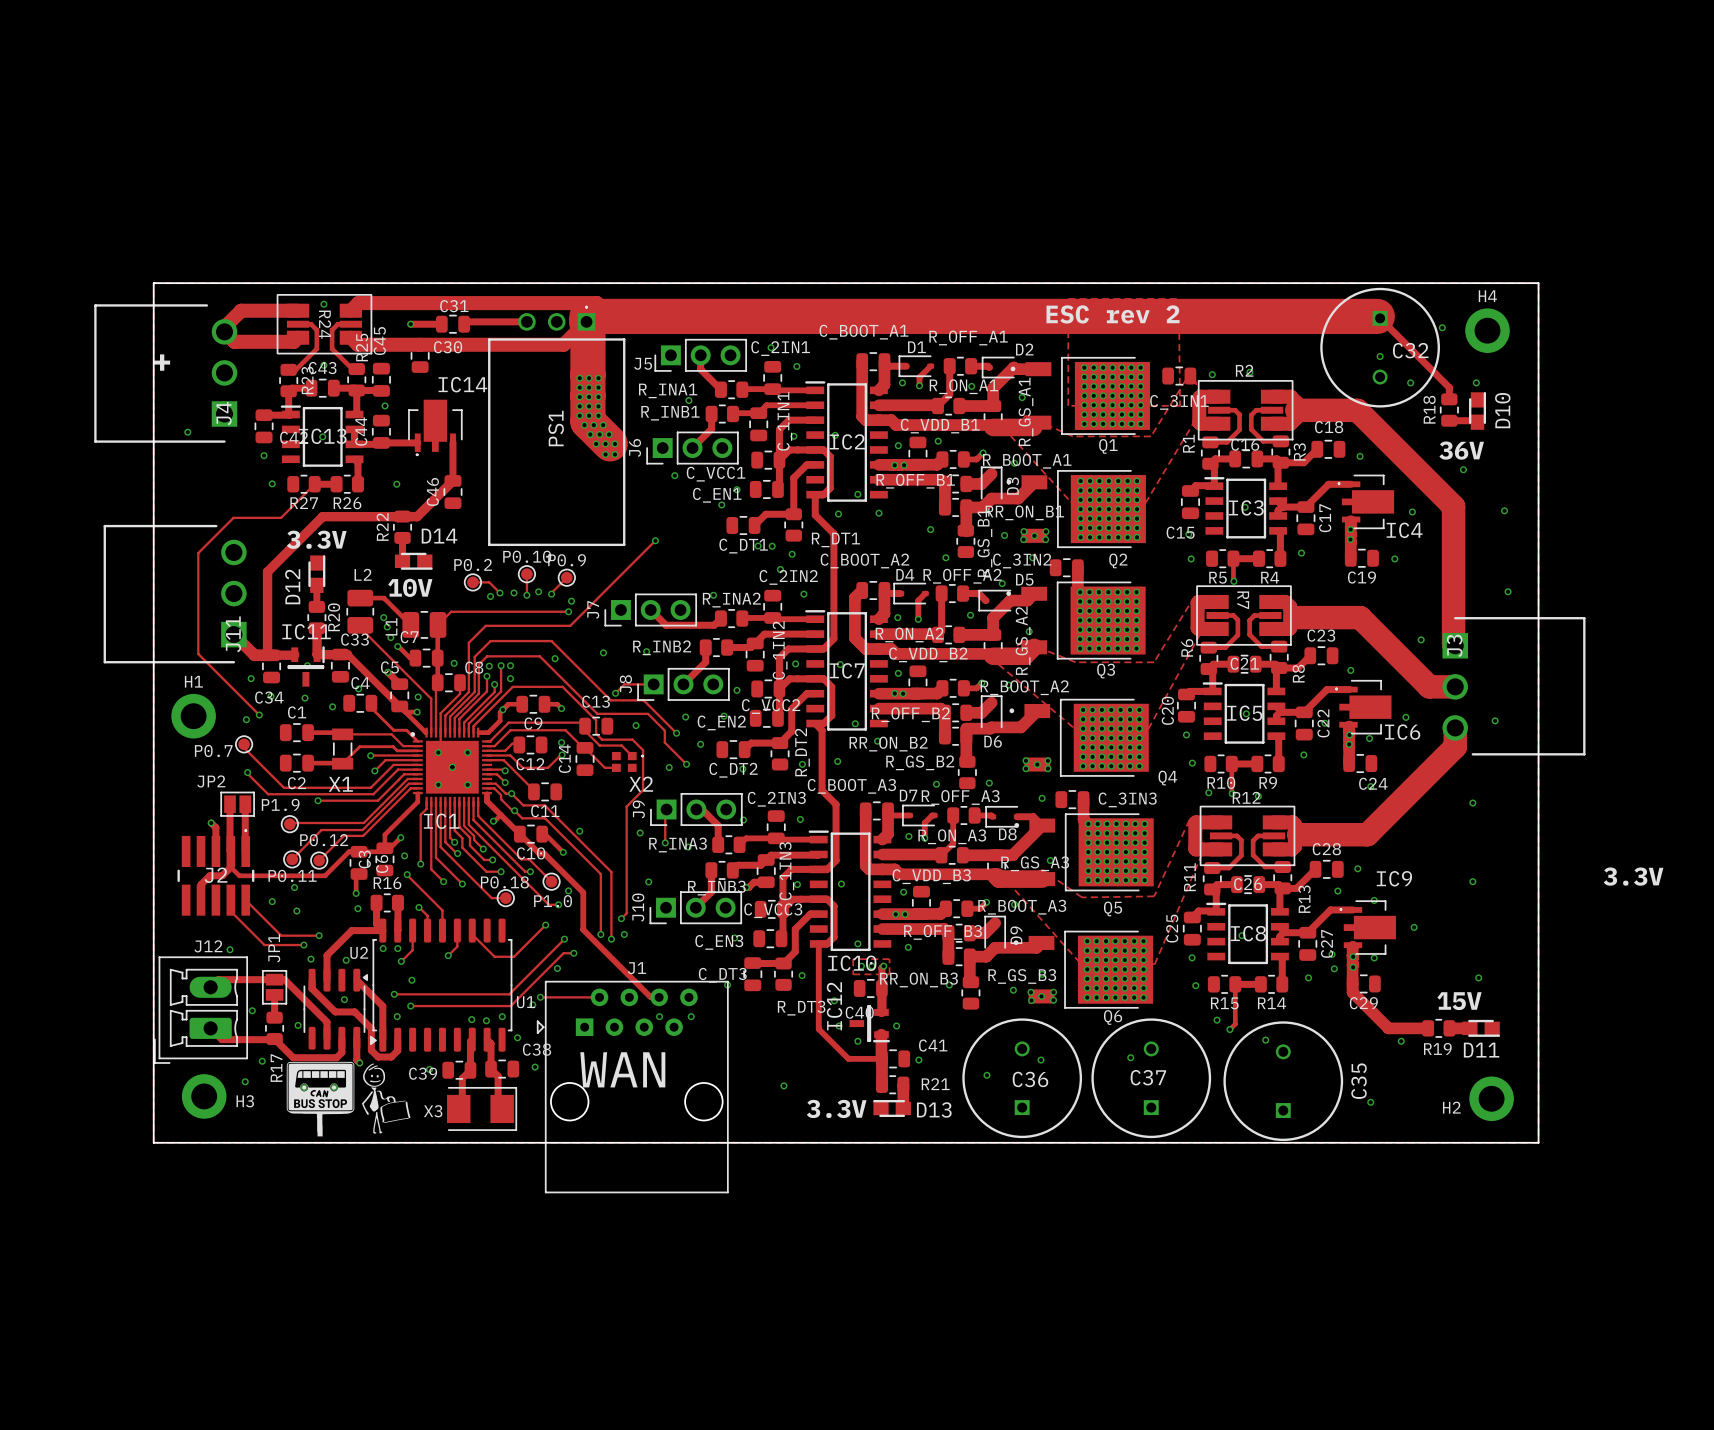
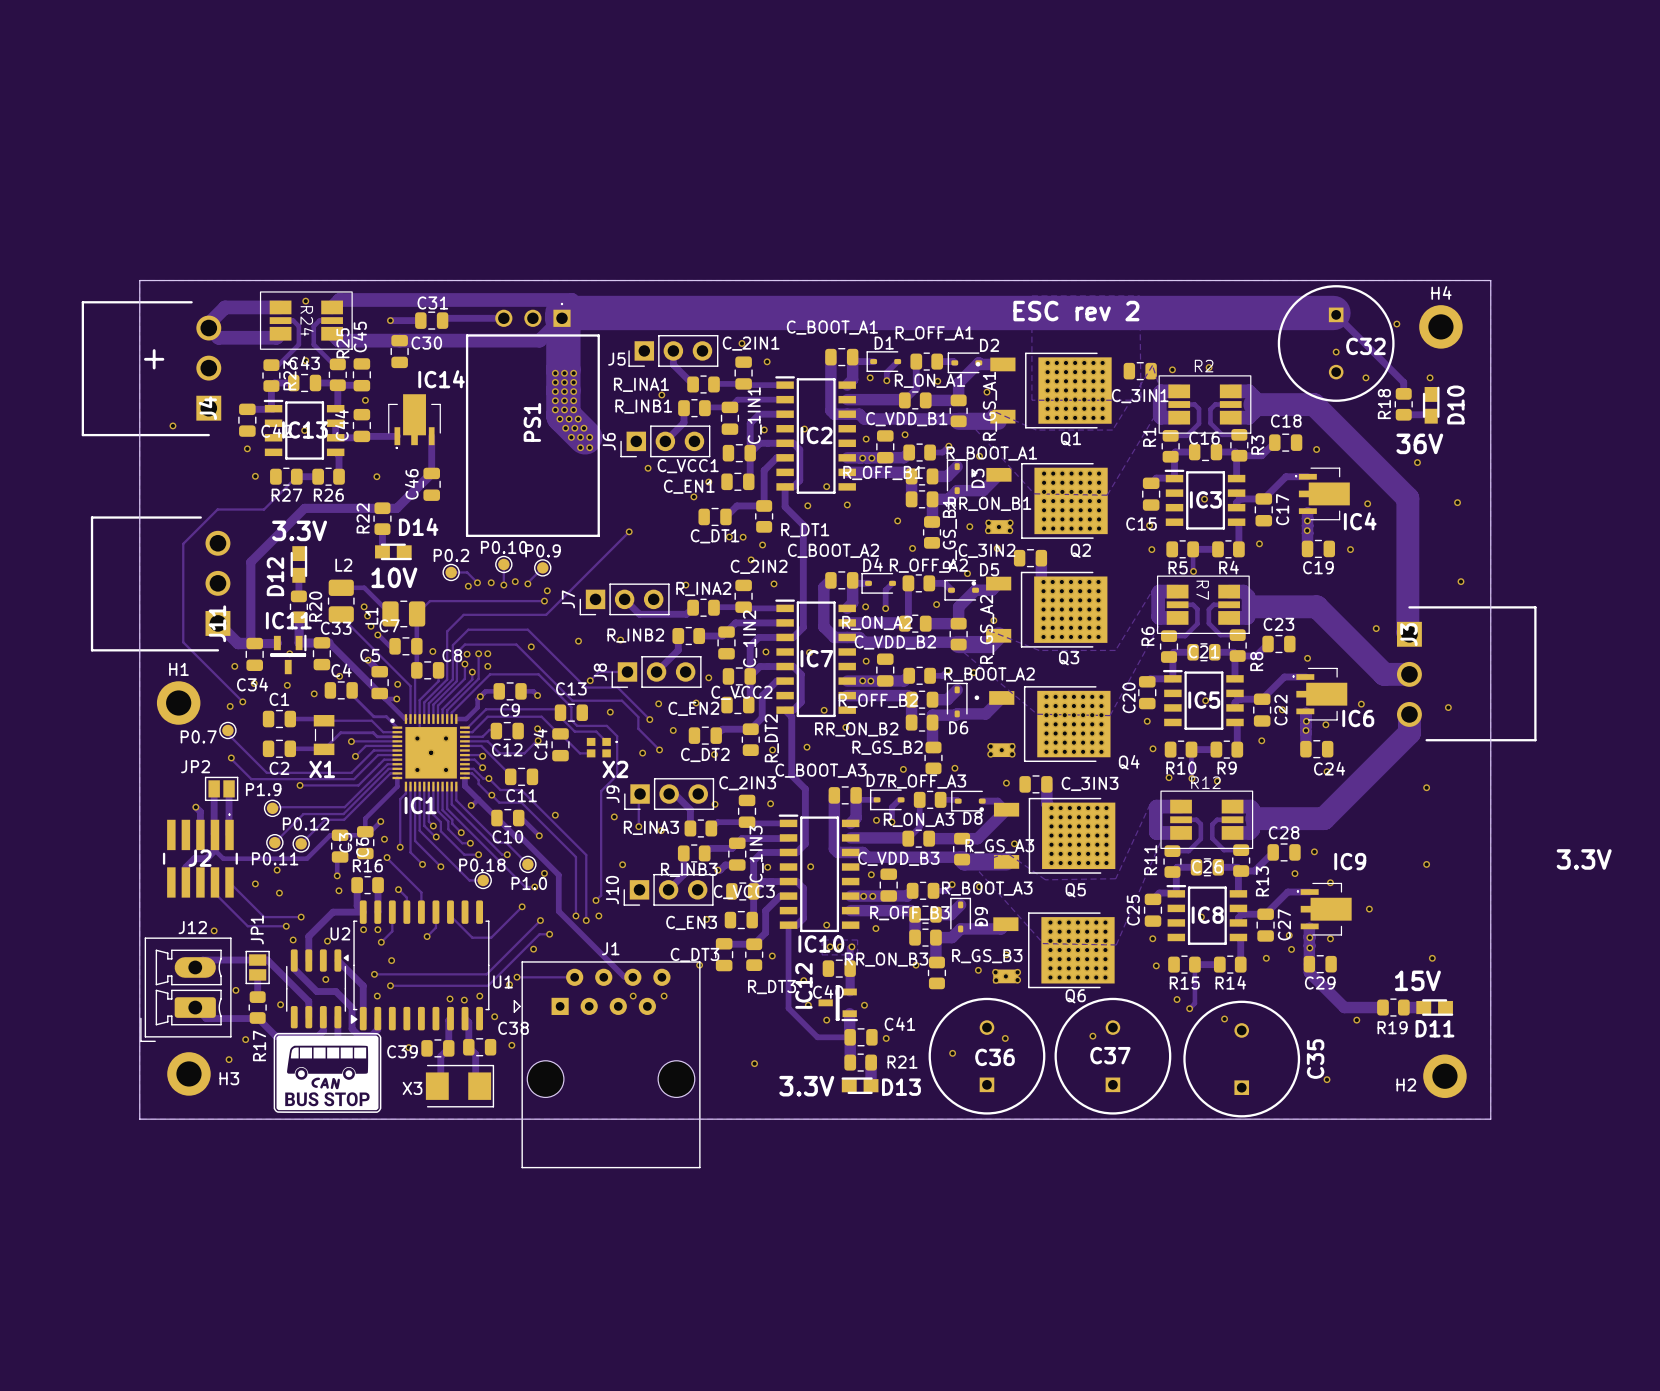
drawing shape: [286, 1061, 411, 1137] -> [273, 1032, 382, 1113]
text: WAN (622, 1069) -> none
via: (304, 1087) -> none
via: (334, 1087) -> none

